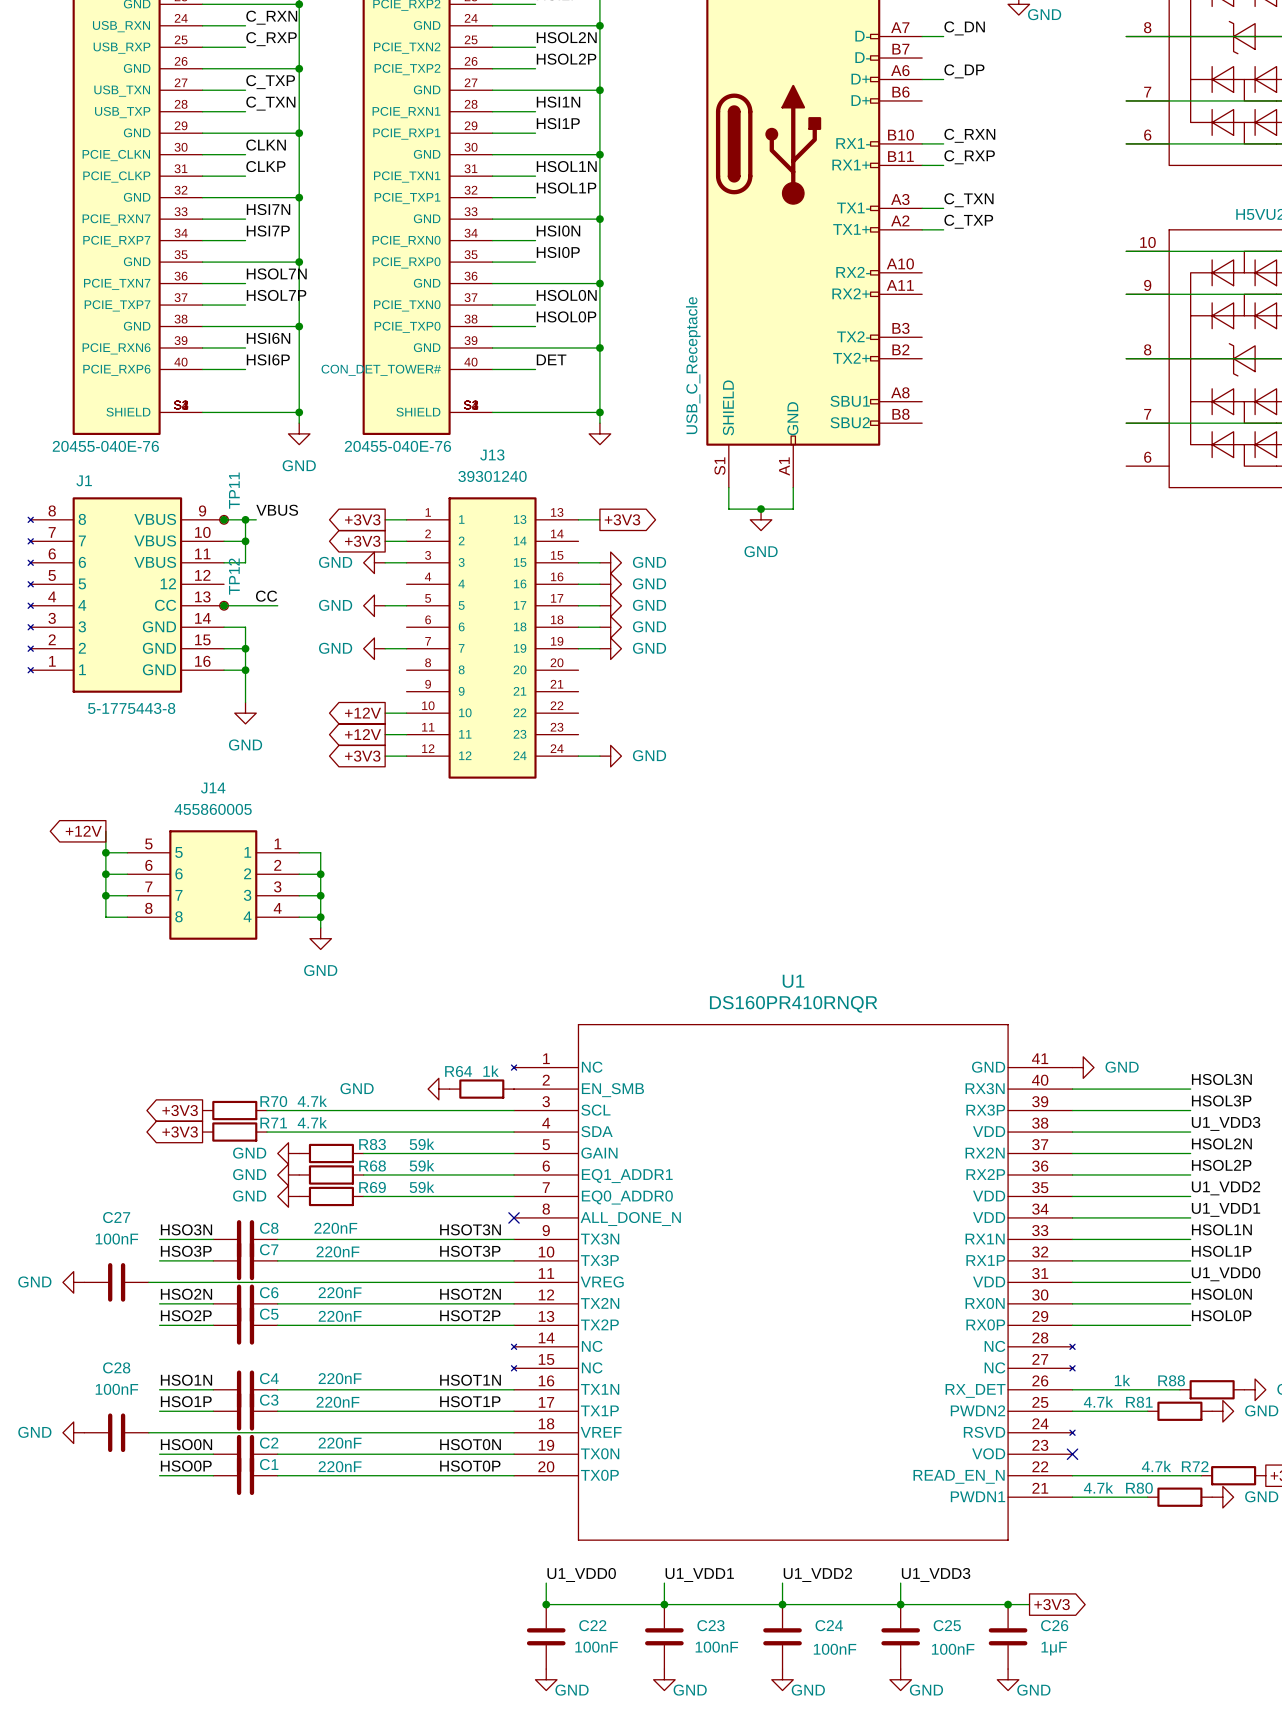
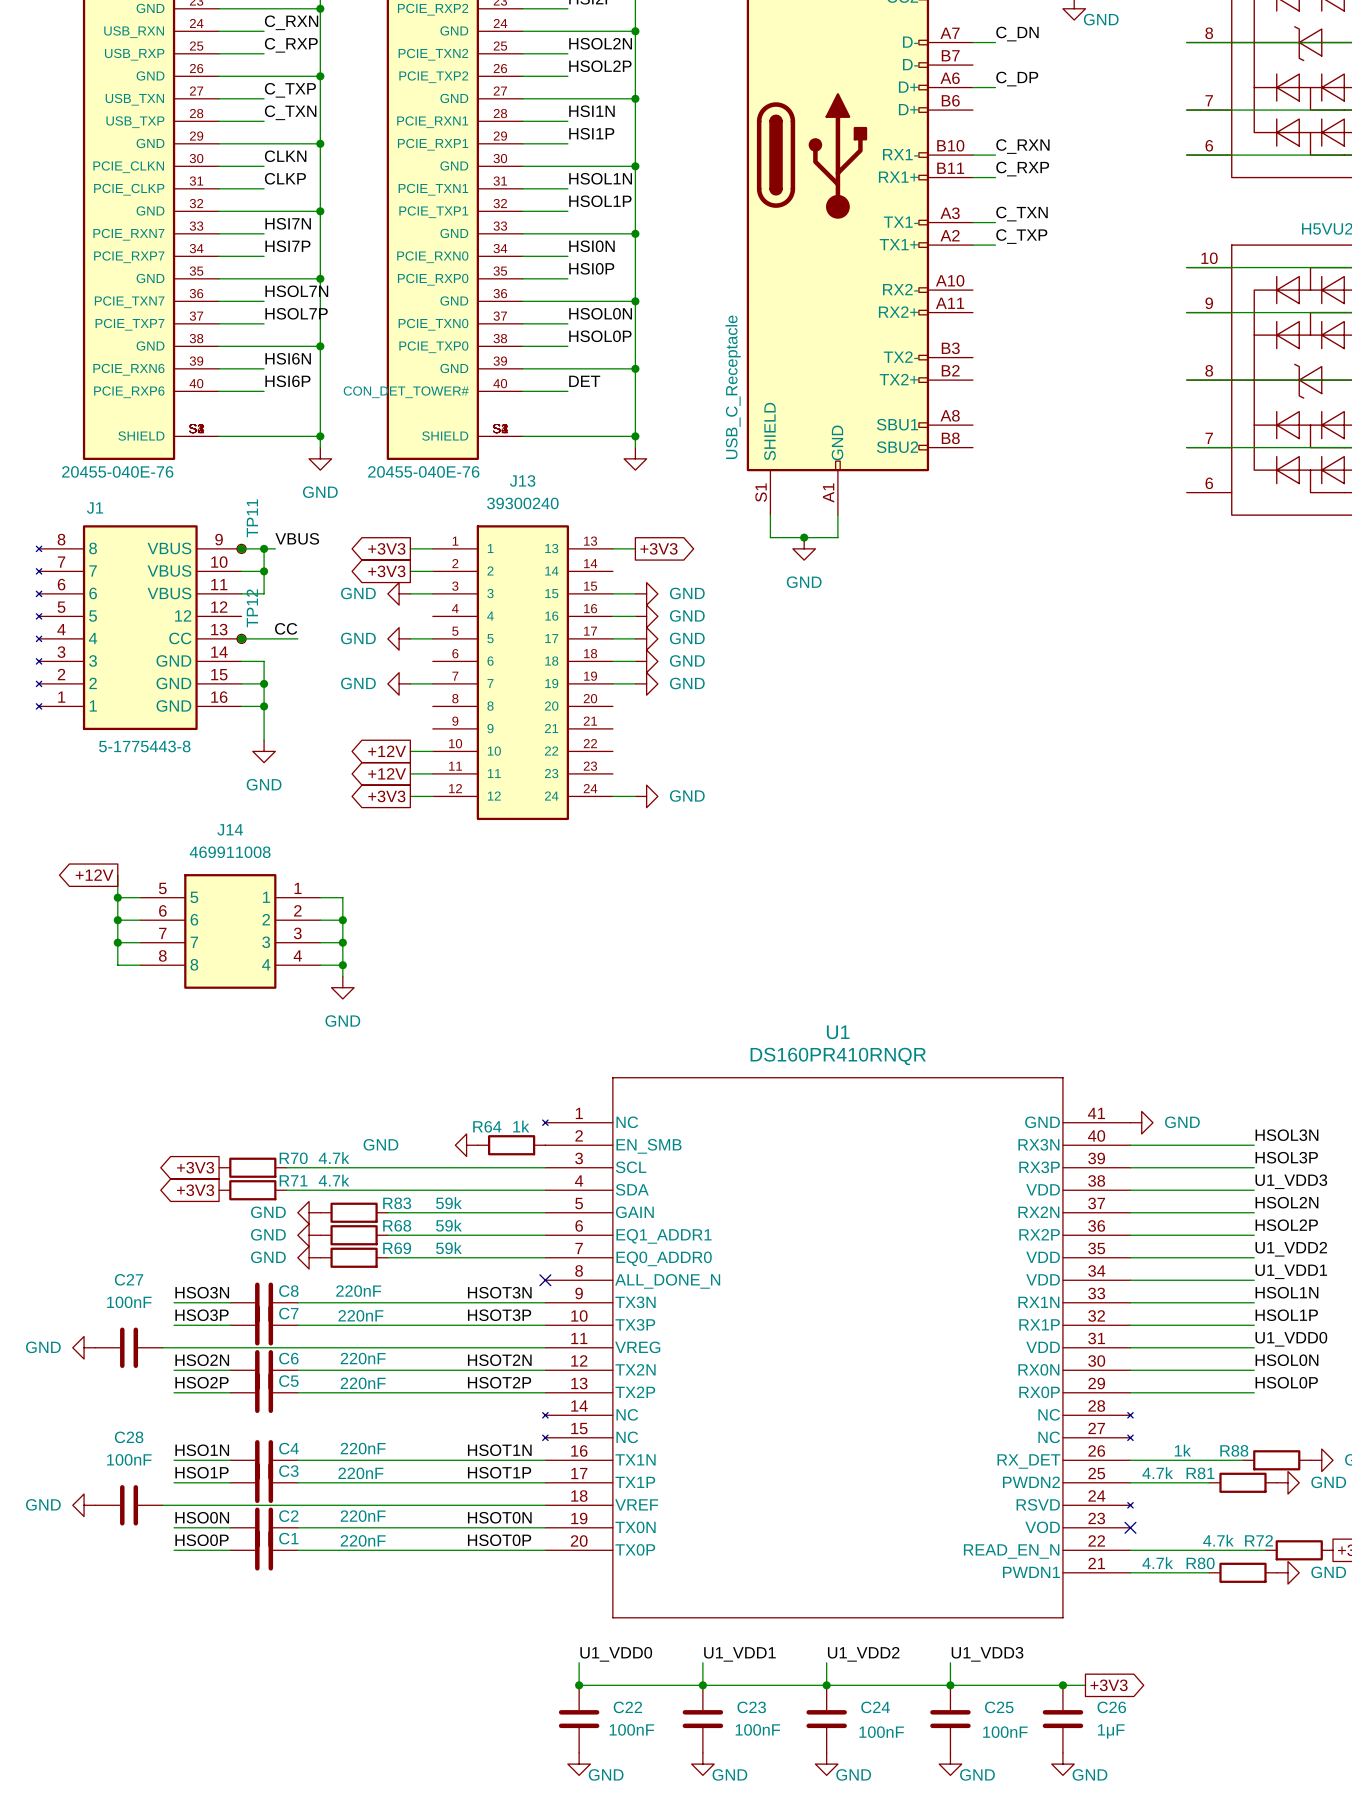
J13 value: 39301240 (492, 476) -> 39300240 (522, 503)
J14 value: 455860005 (213, 809) -> 469911008 (230, 852)

